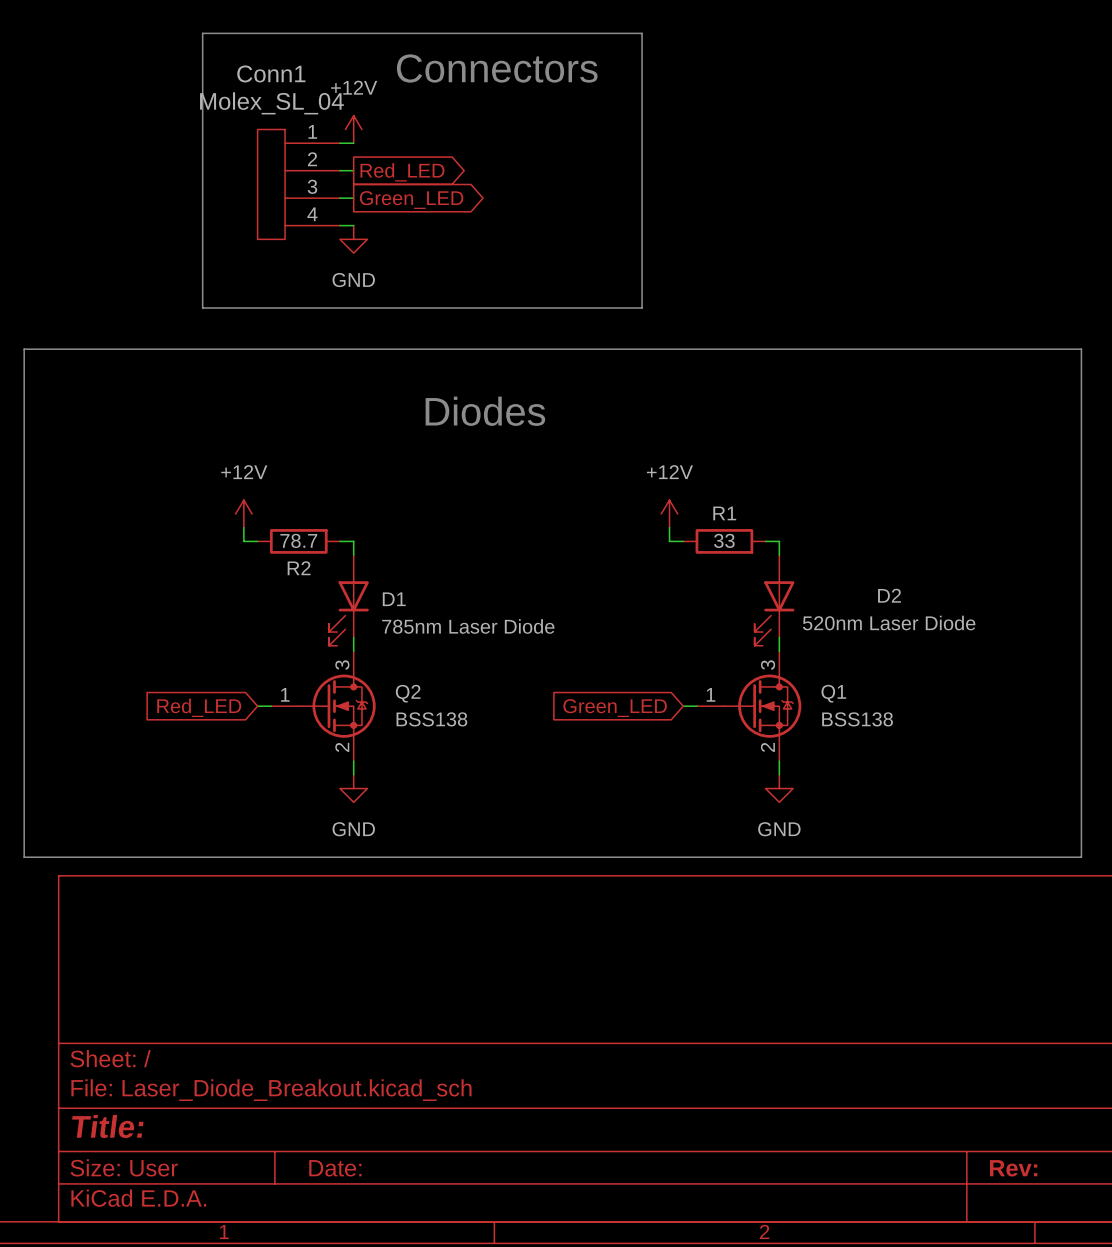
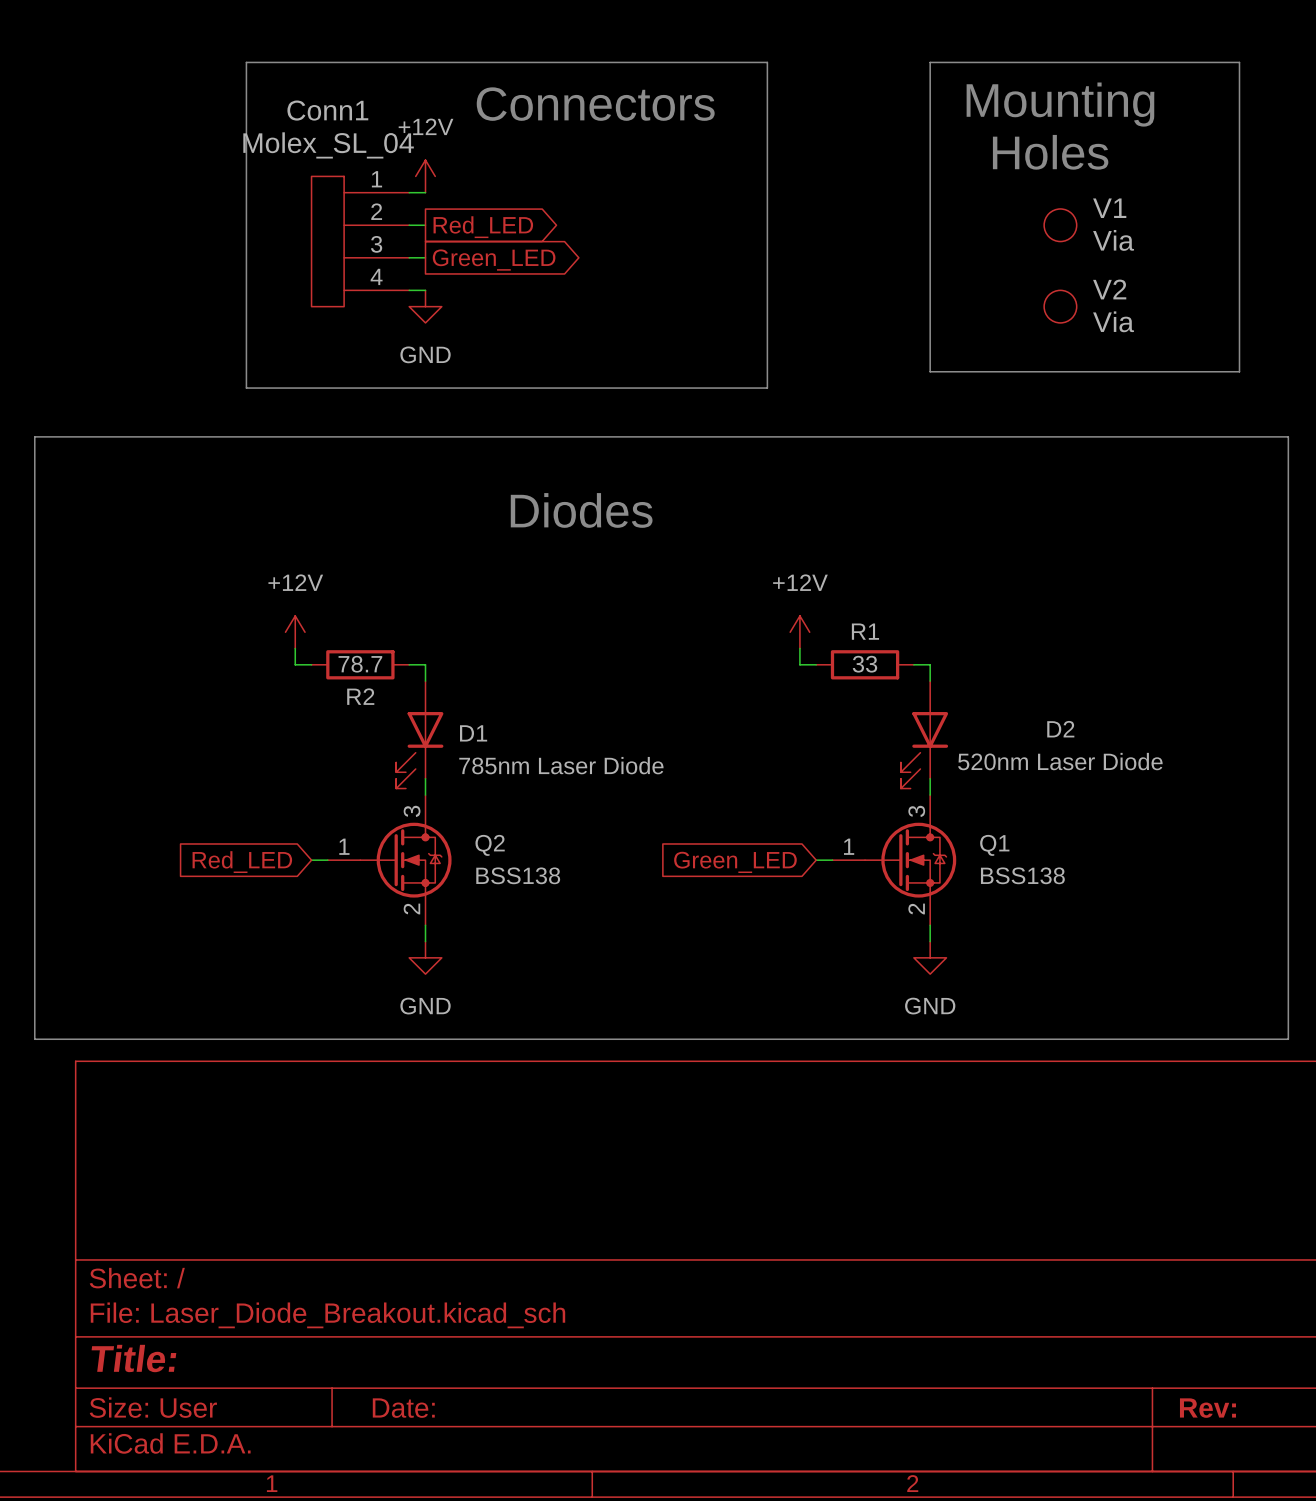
line: none -> (930, 62) (930, 371) (1239, 371) (1239, 62) (930, 62)
text: none -> Mounting (1060, 104)
text: none -> Holes (1050, 152)
V1: none -> Via (1060, 225)
V2: none -> Via (1060, 306)

